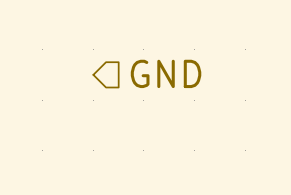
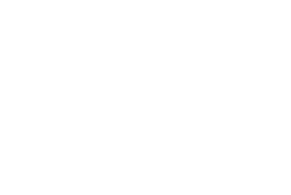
hierarchical label: GND (166, 73) -> none

